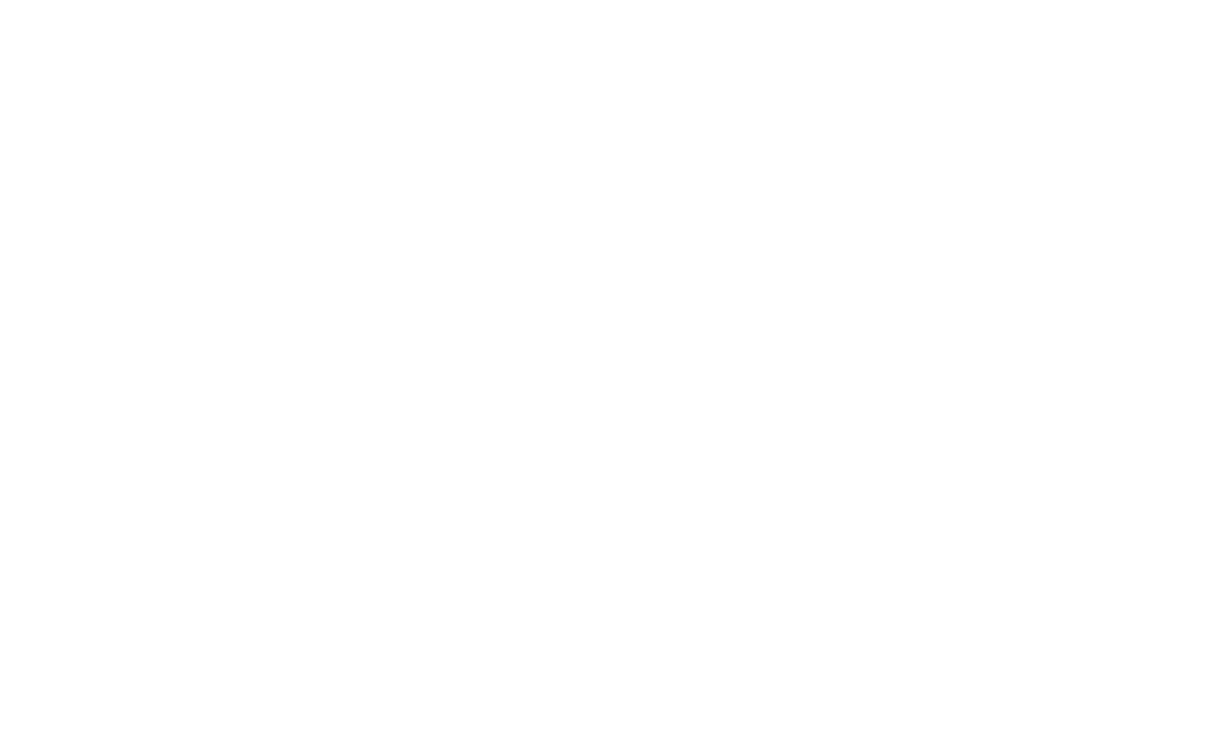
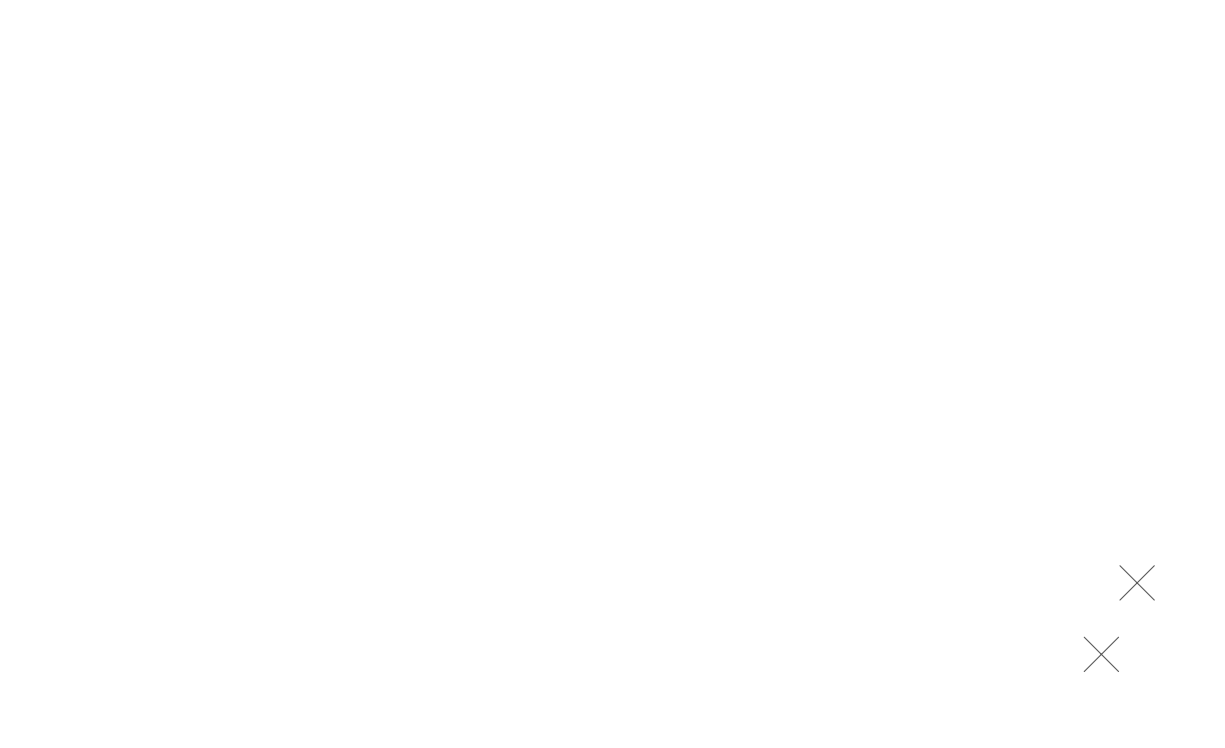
no-connect mark: none -> (1137, 582)
no-connect mark: none -> (1101, 654)

